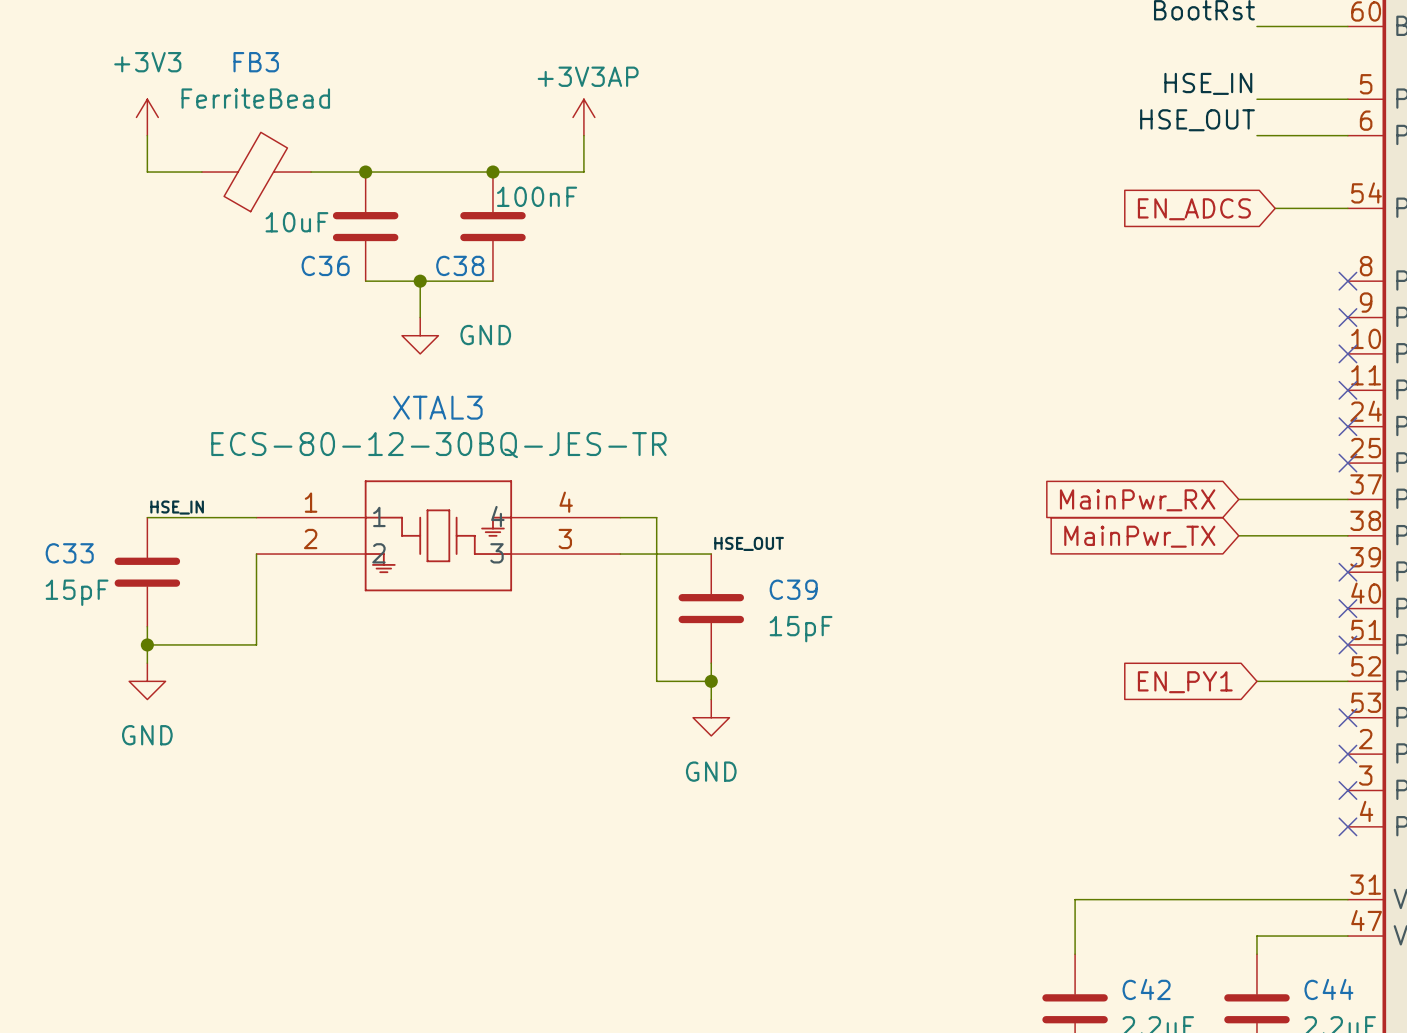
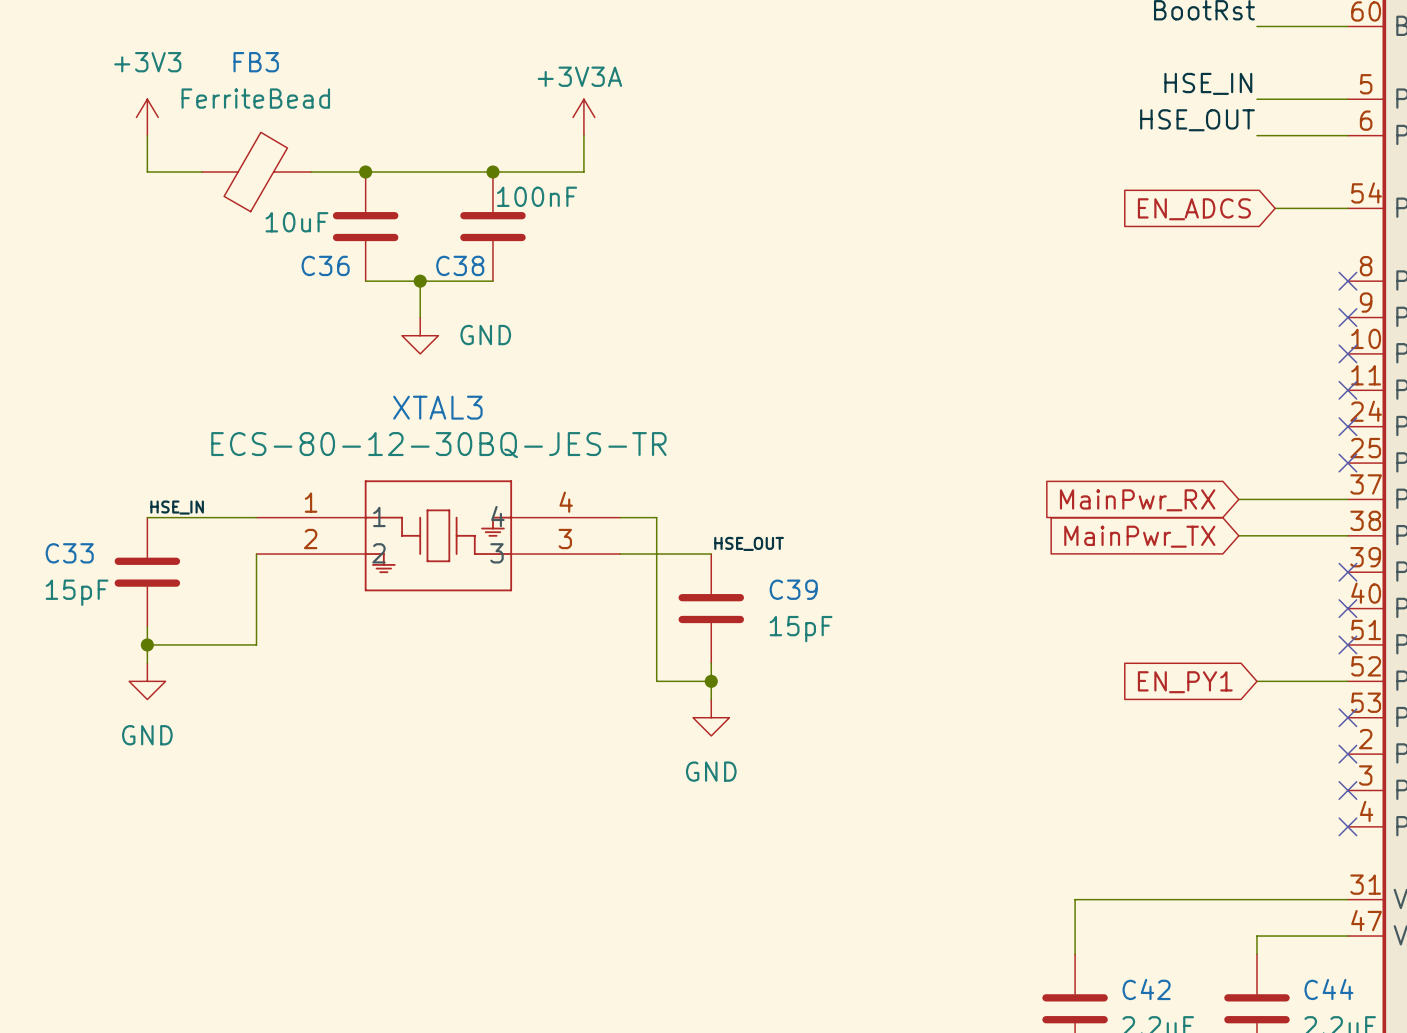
power symbol: +3V3AP (583, 117) -> +3V3A (583, 117)

